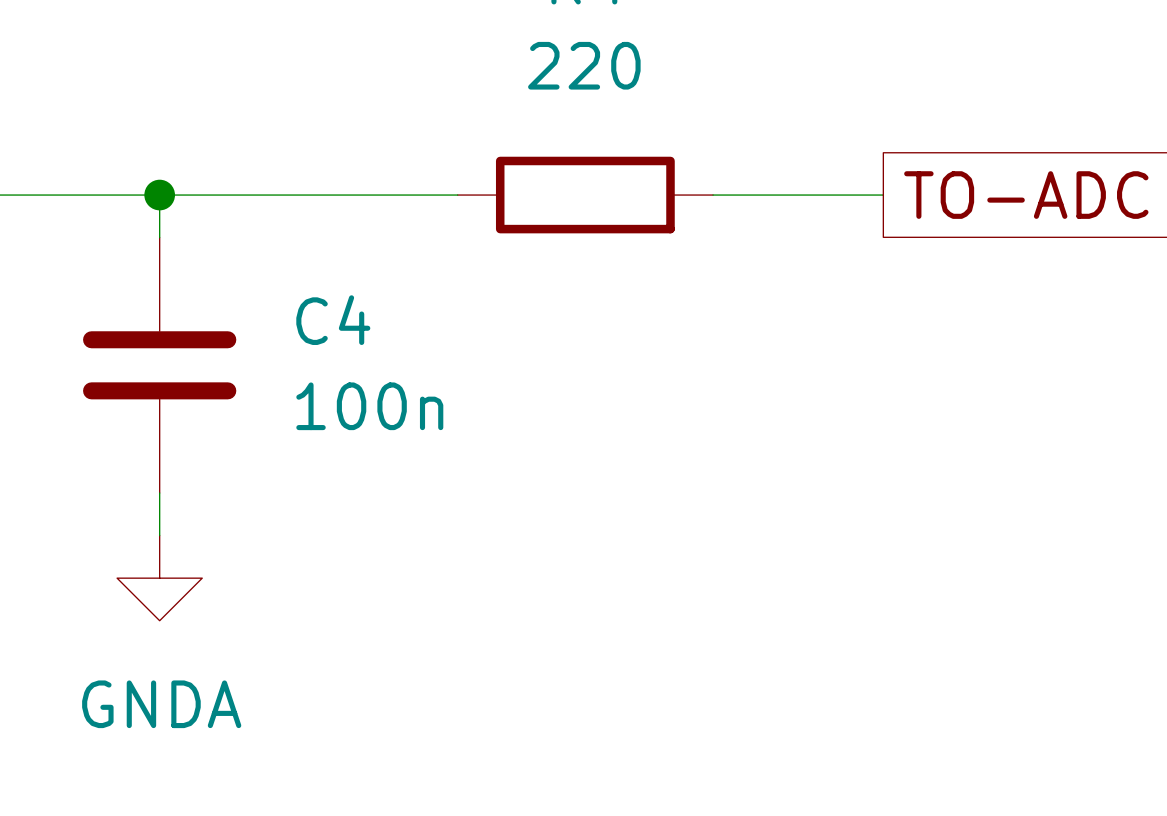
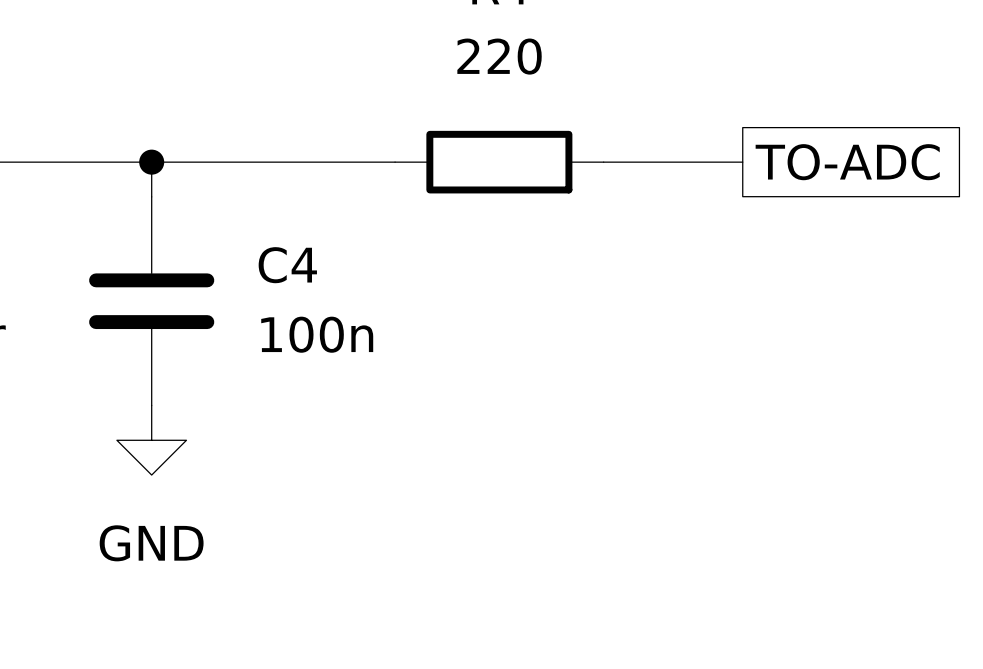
power symbol: none -> GND (151, 440)
power symbol: GNDA (159, 578) -> none

